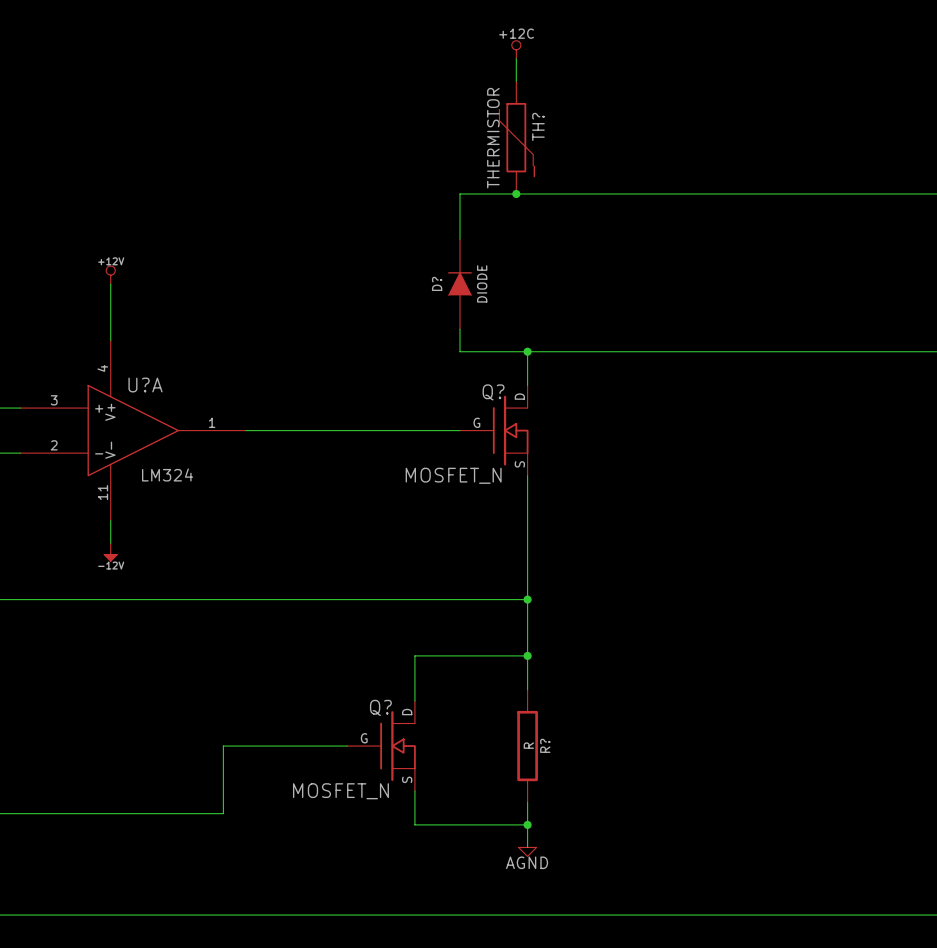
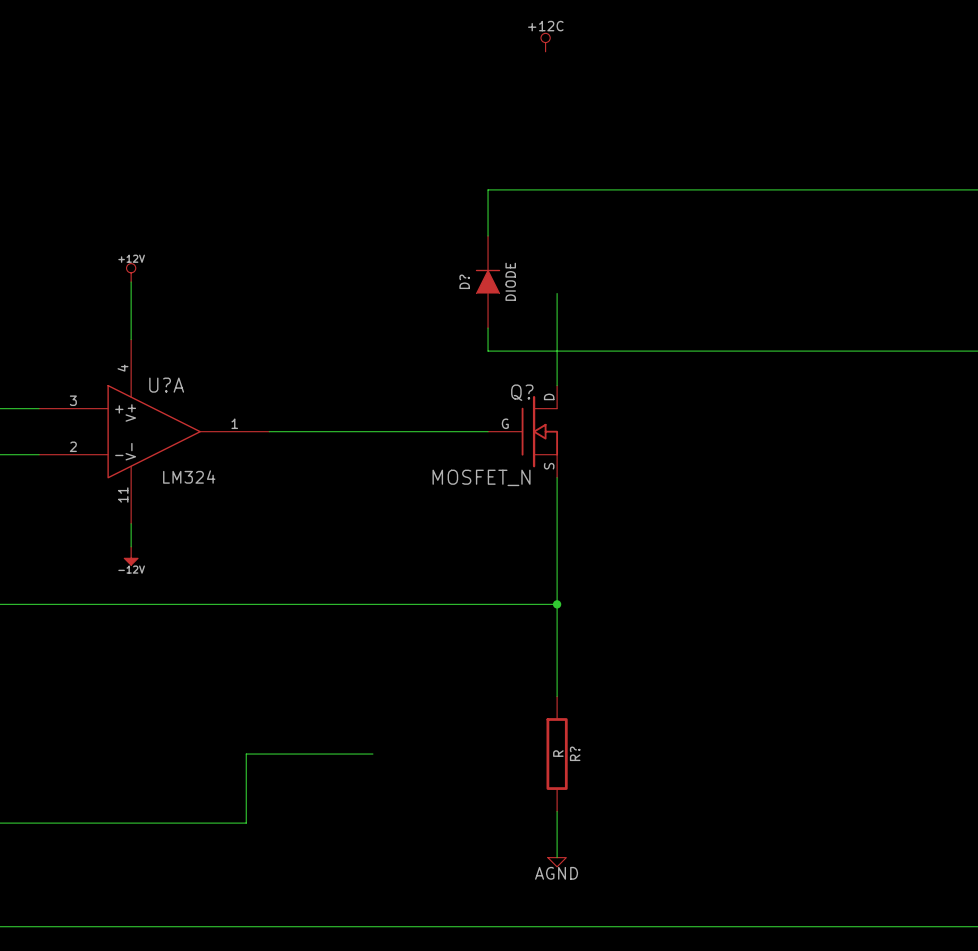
wire: (516, 58) (516, 81) -> none
TH?: THERMISTOR (516, 137) -> none
junction: (516, 193) -> none
wire: none -> (557, 293) (557, 351)
junction: (527, 351) -> none
wire: (527, 655) (414, 655) (414, 700) -> none
junction: (527, 655) -> none
Q?: MOSFET_N (381, 746) -> none
wire: (414, 791) (414, 824) (527, 824) -> none
junction: (527, 824) -> none

